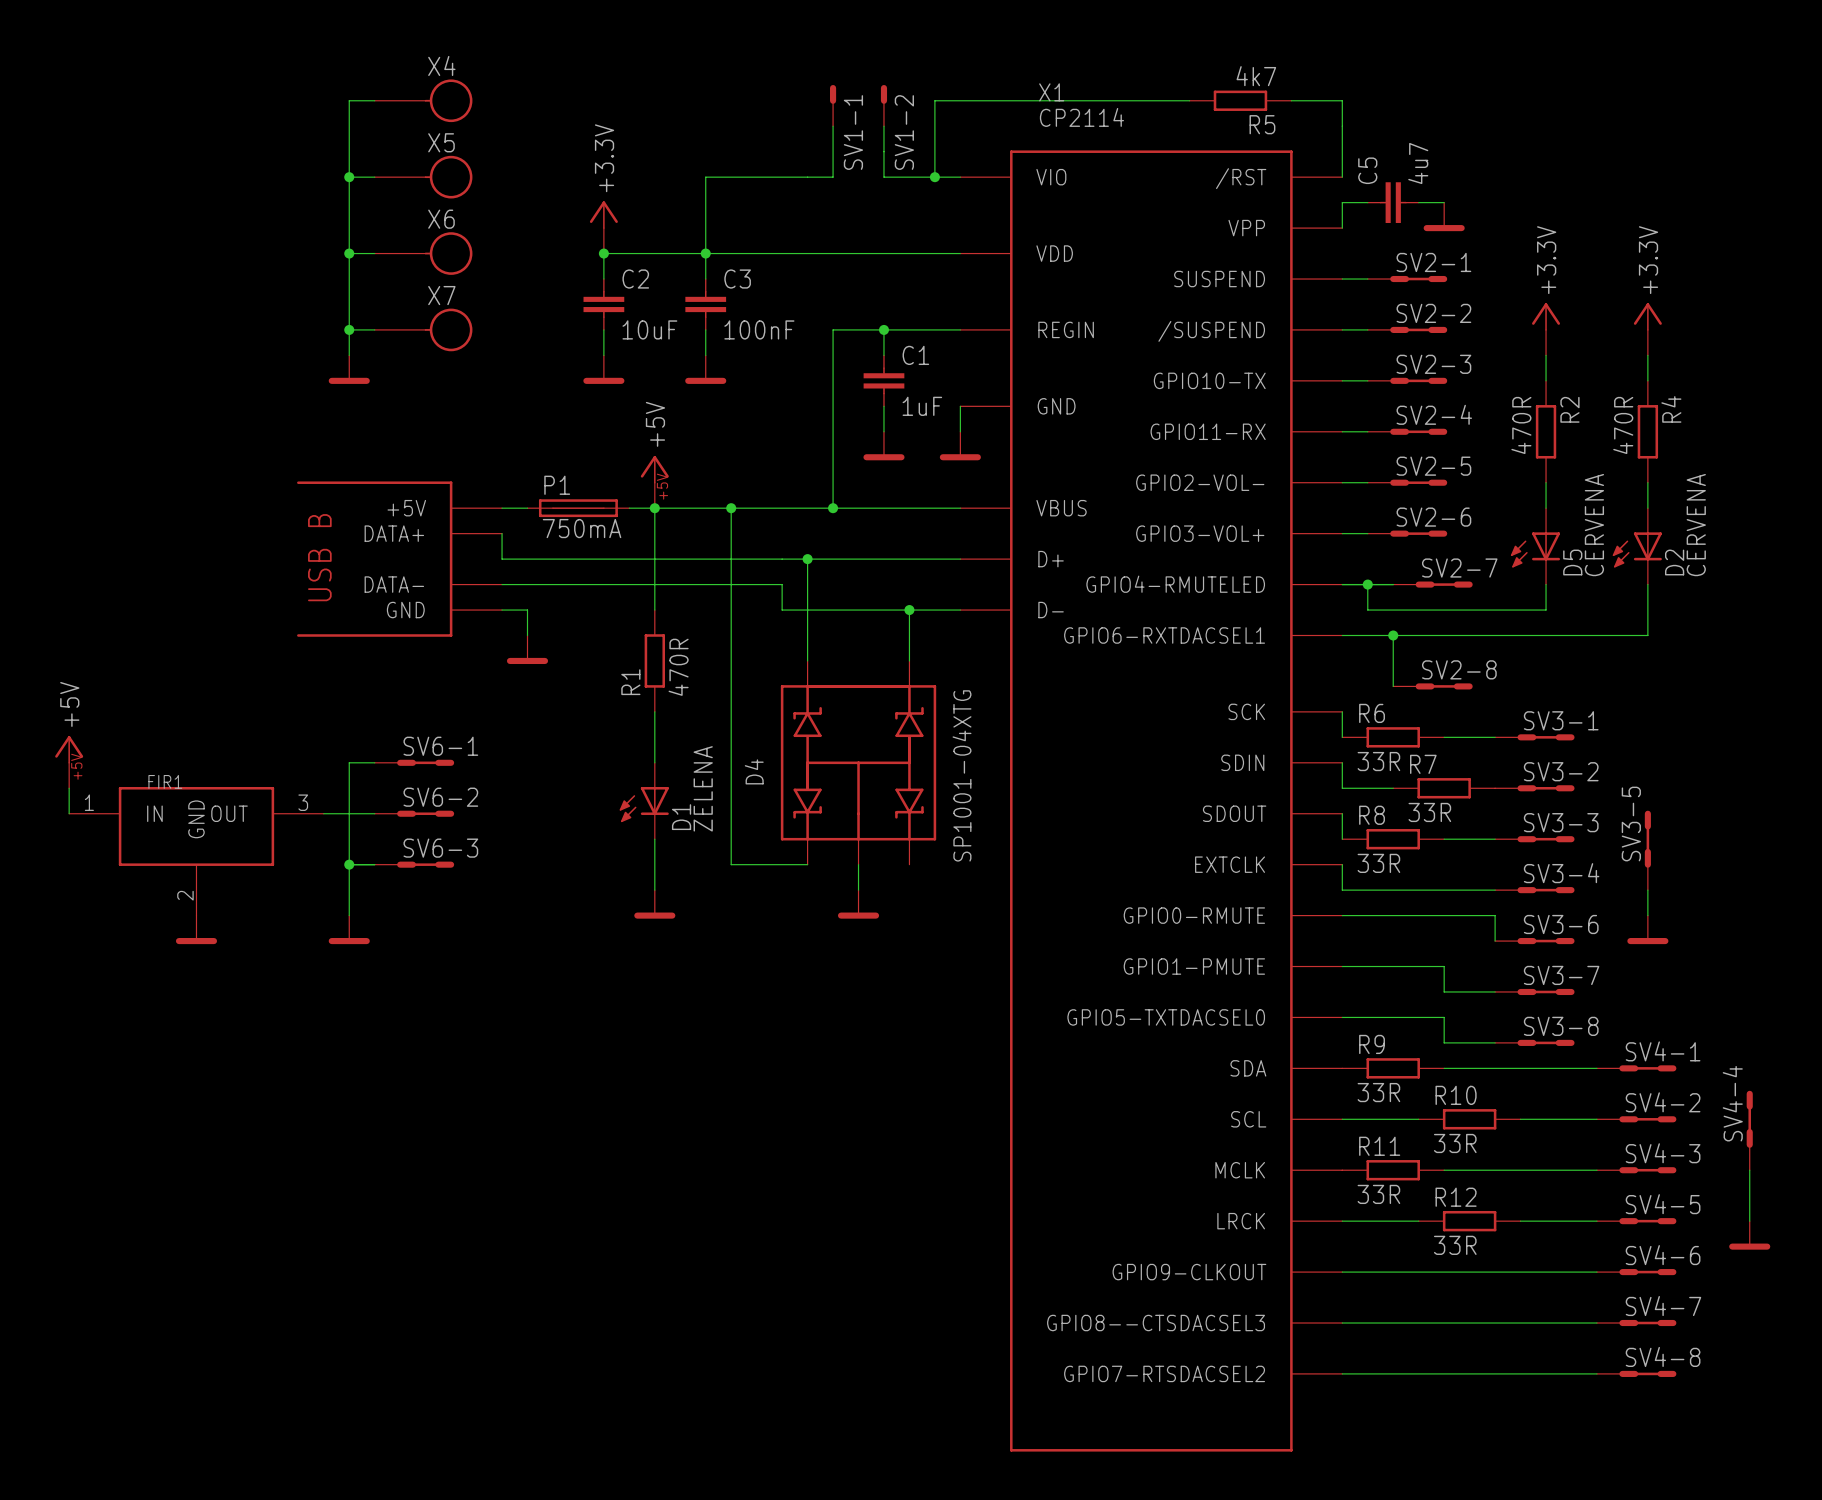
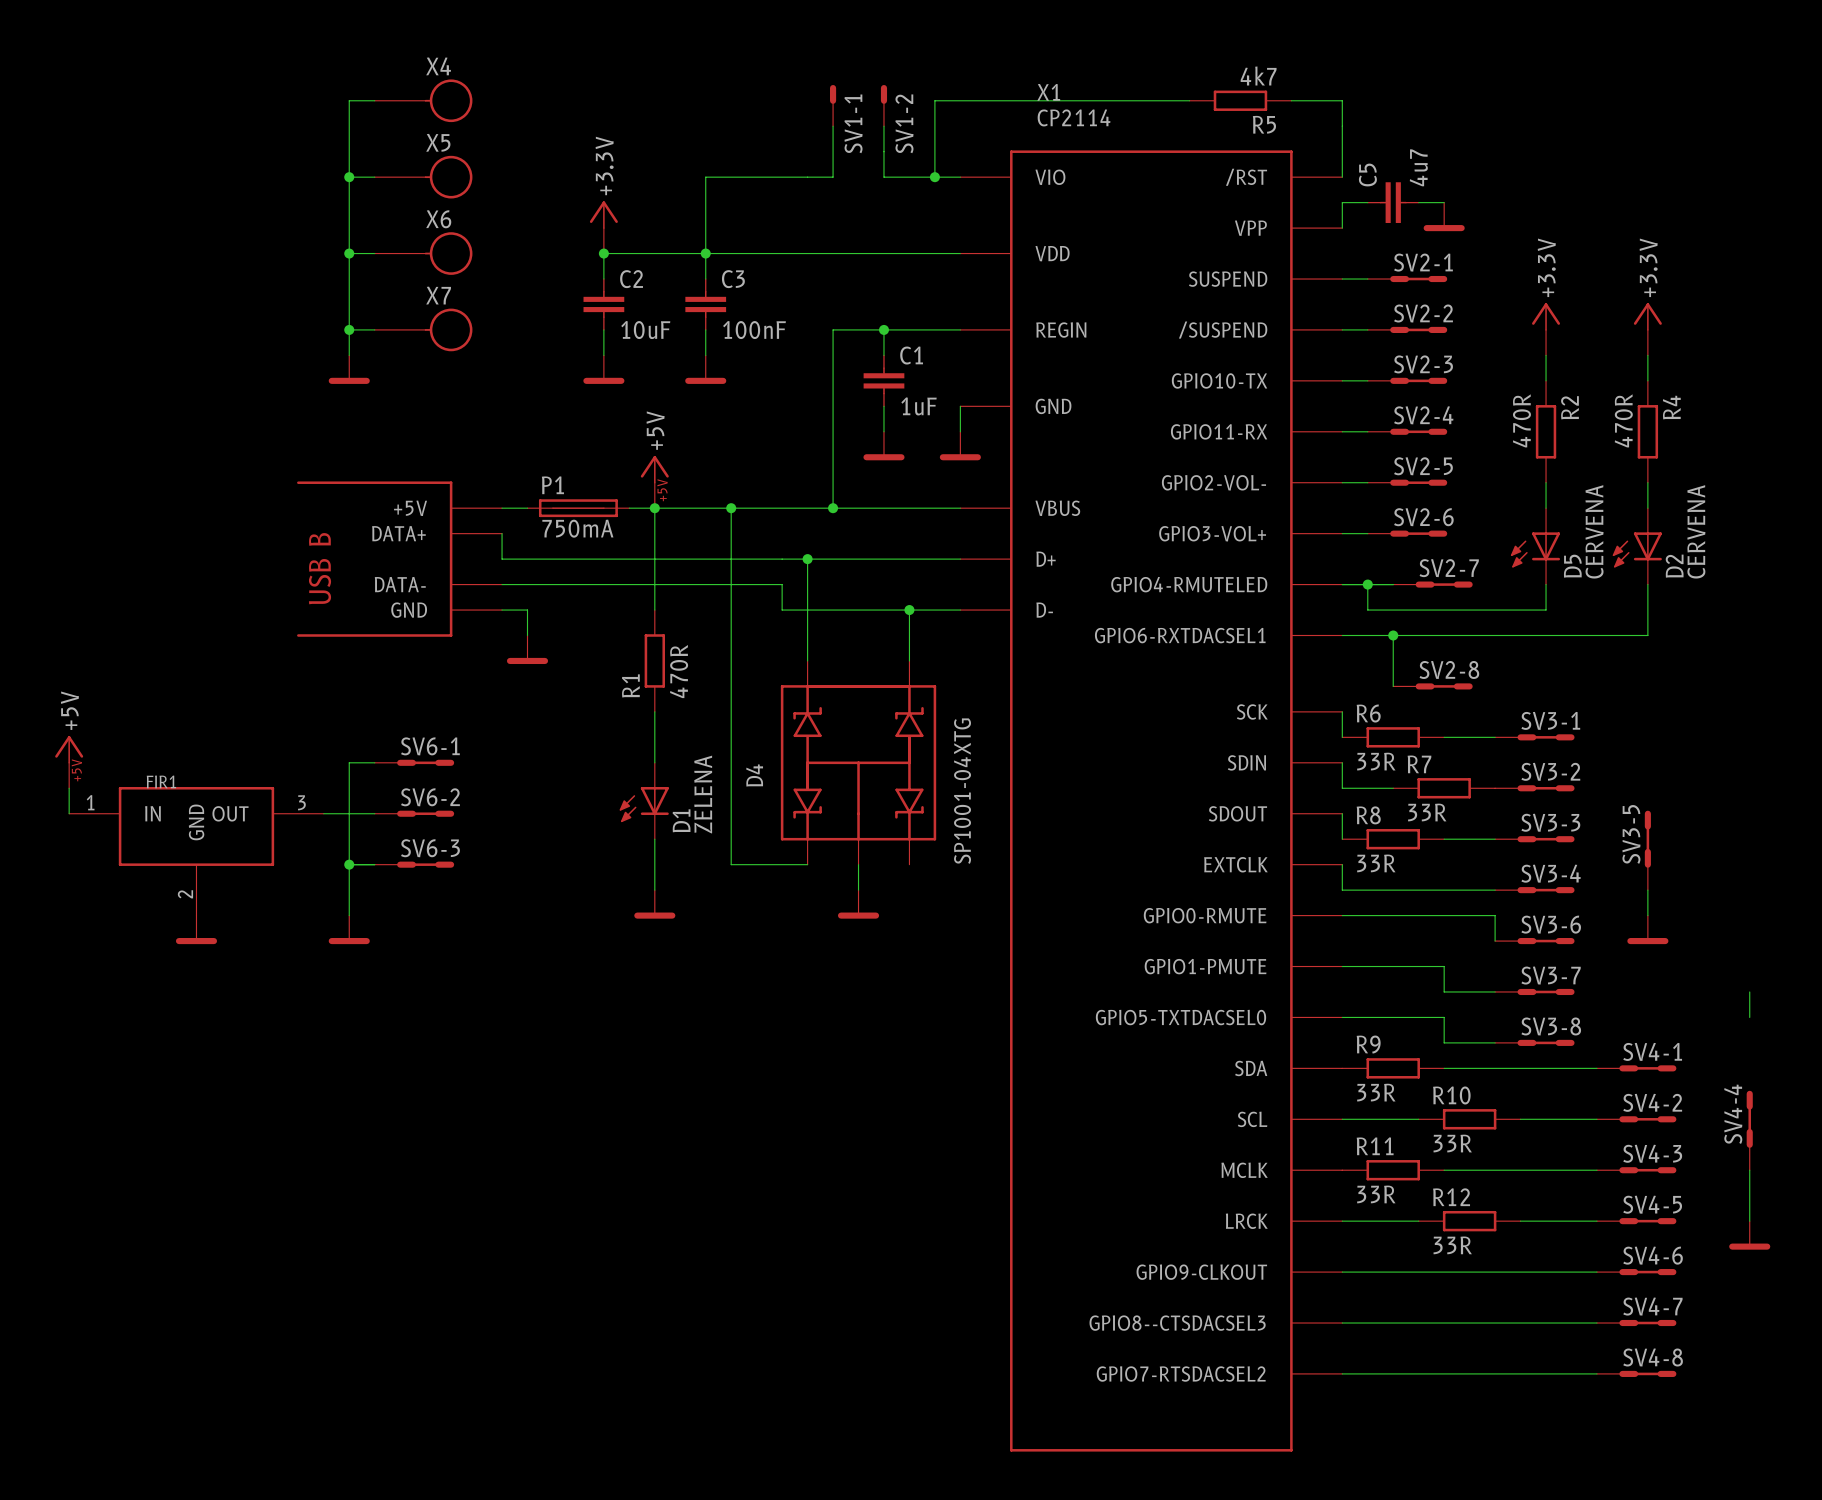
wire: none -> (1749, 991) (1749, 1017)

